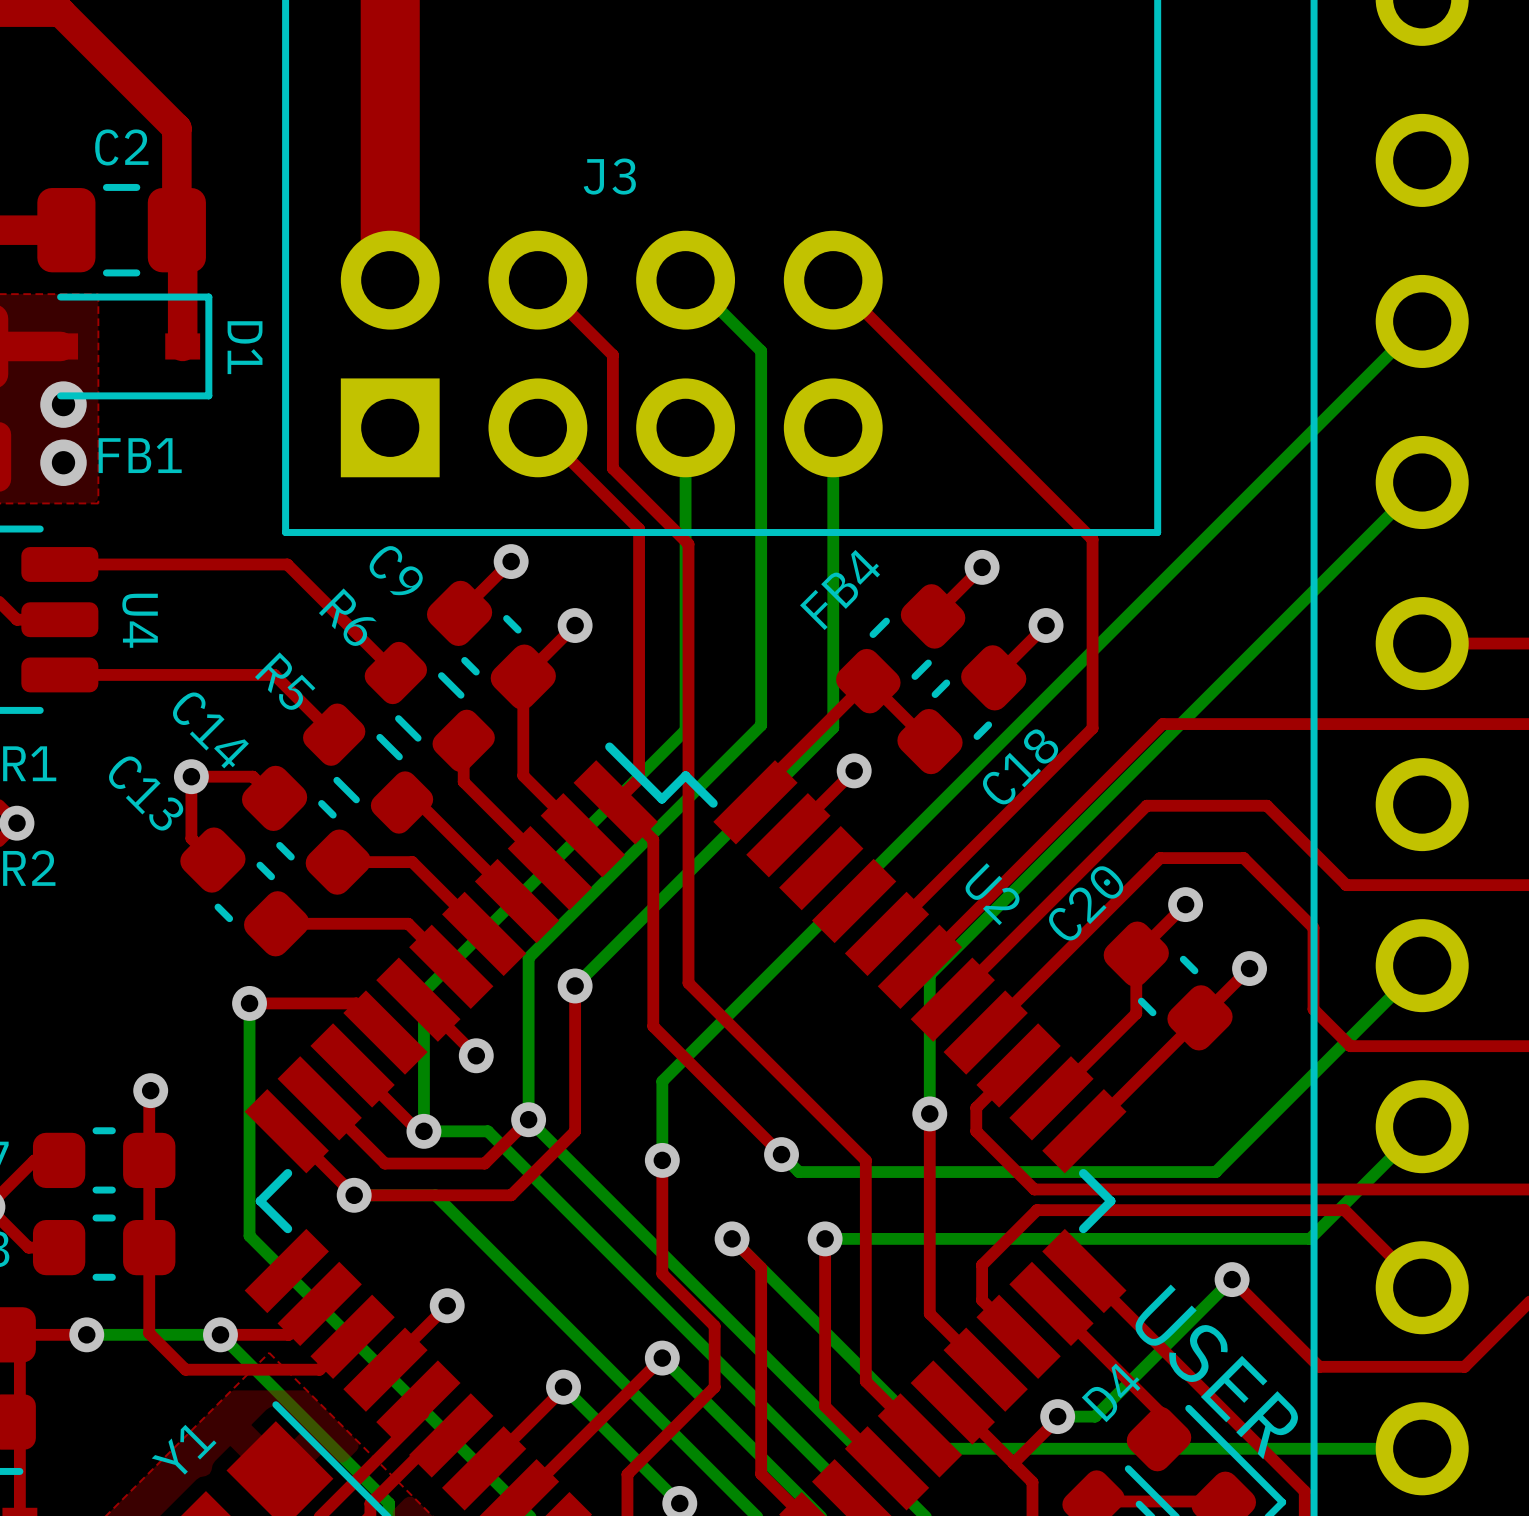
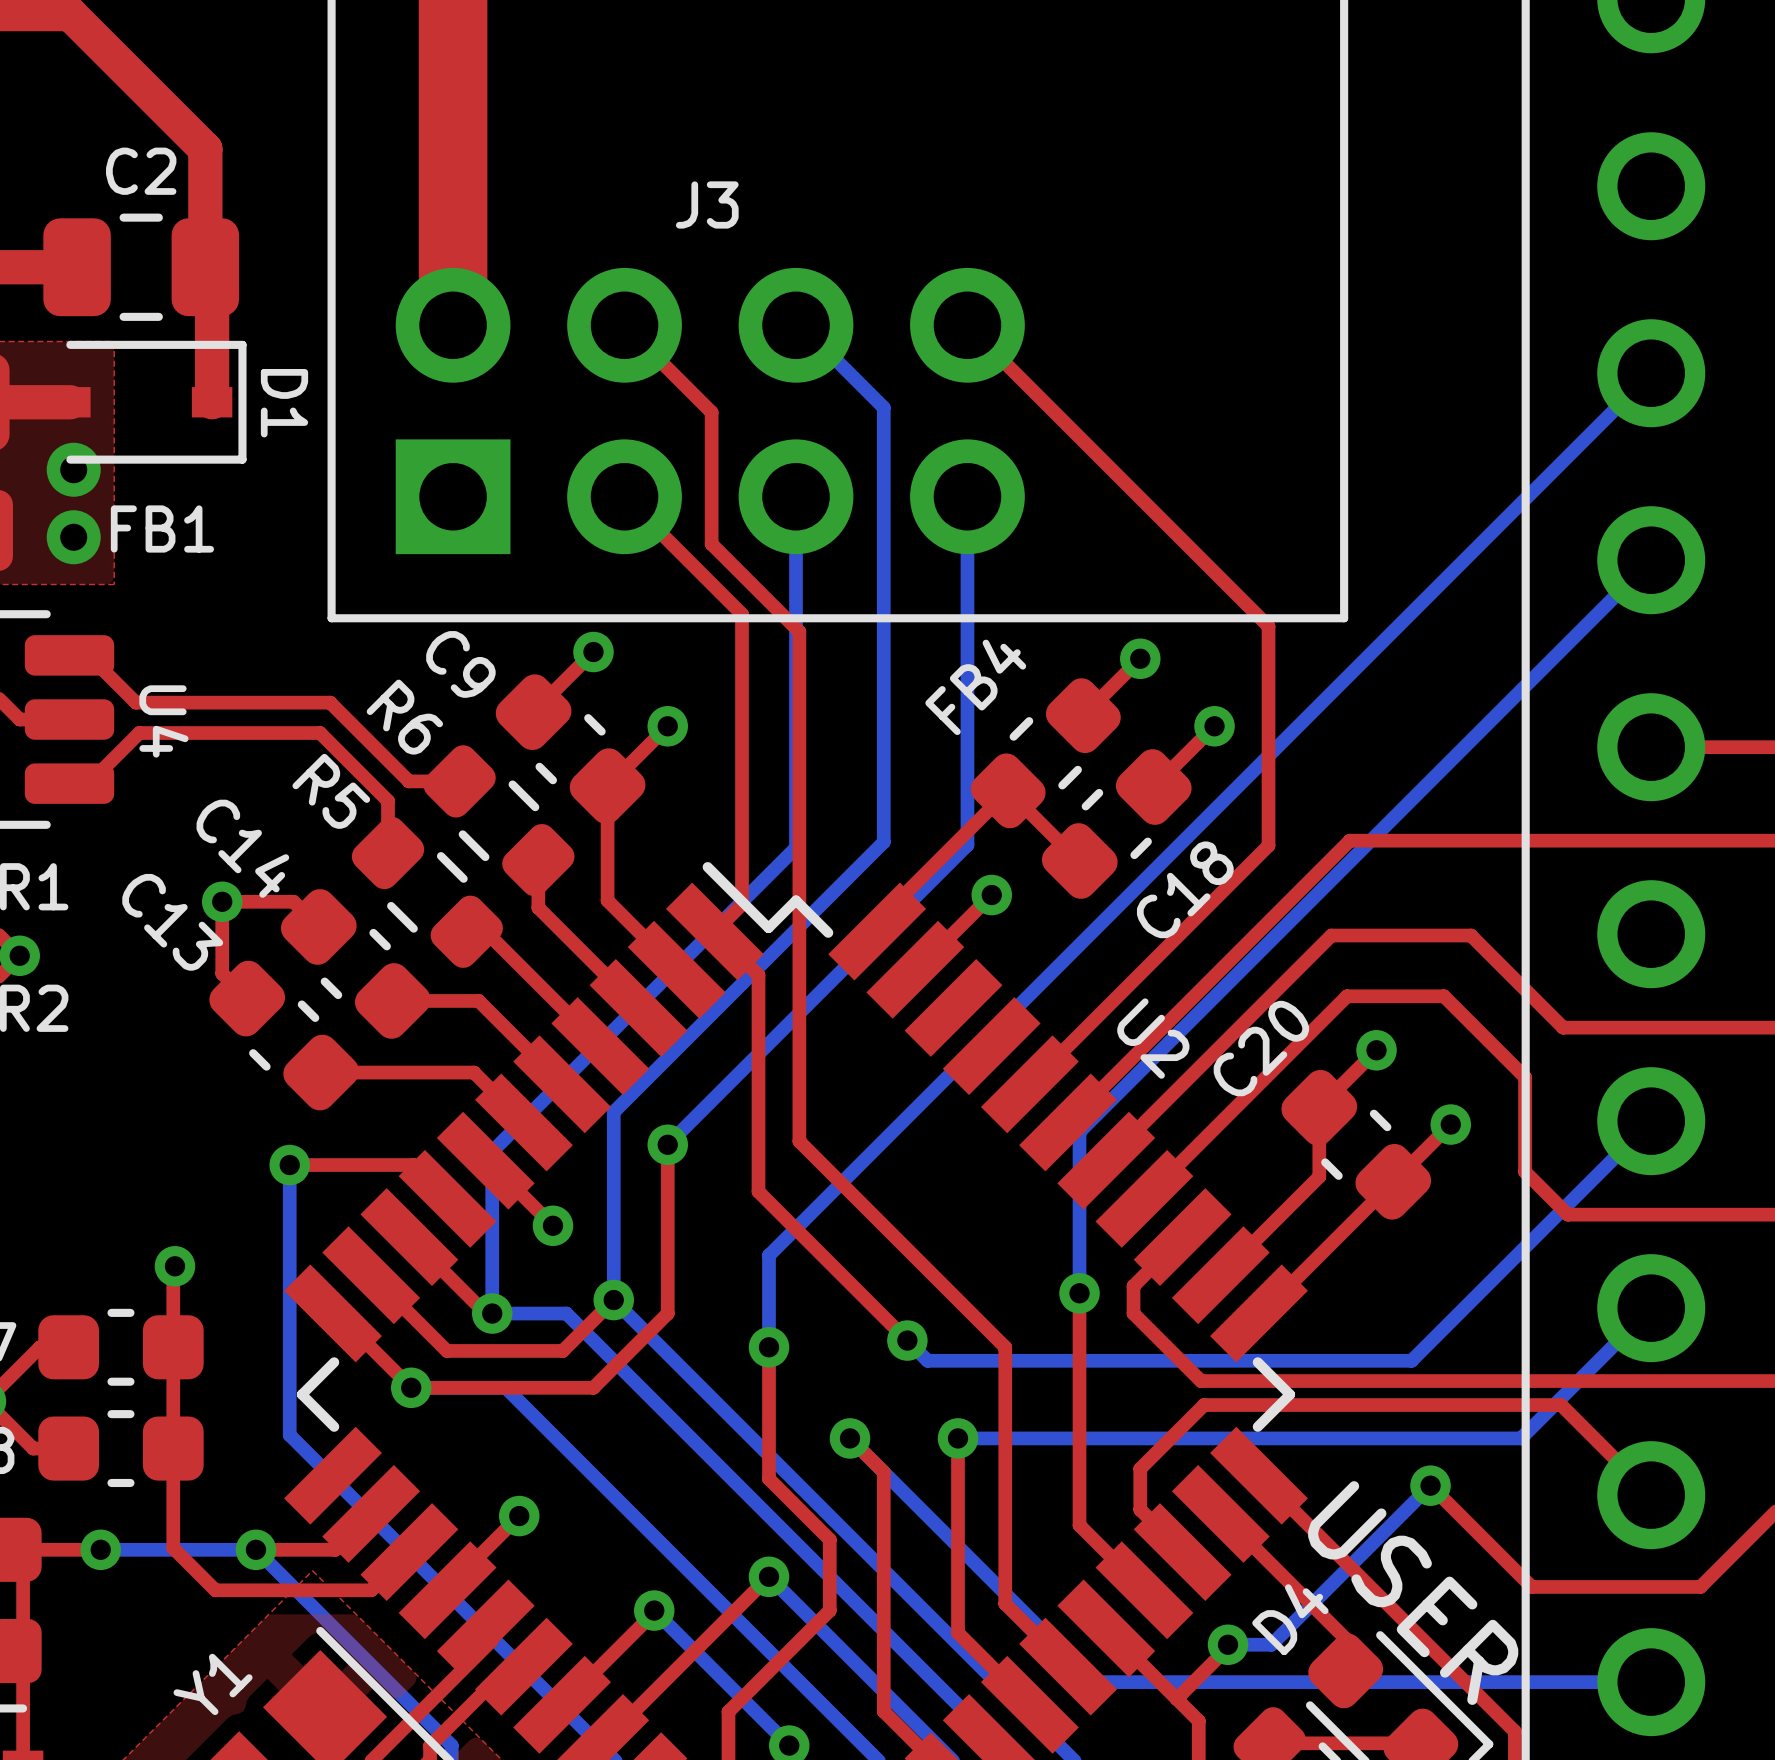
top track: (76, 564) (287, 564) (395, 673) -> (88, 655) (135, 702) (330, 702) (408, 781) (459, 781)
top track: (76, 674) (274, 674) (334, 734) -> (88, 783) (139, 733) (320, 733) (388, 800) (388, 852)

